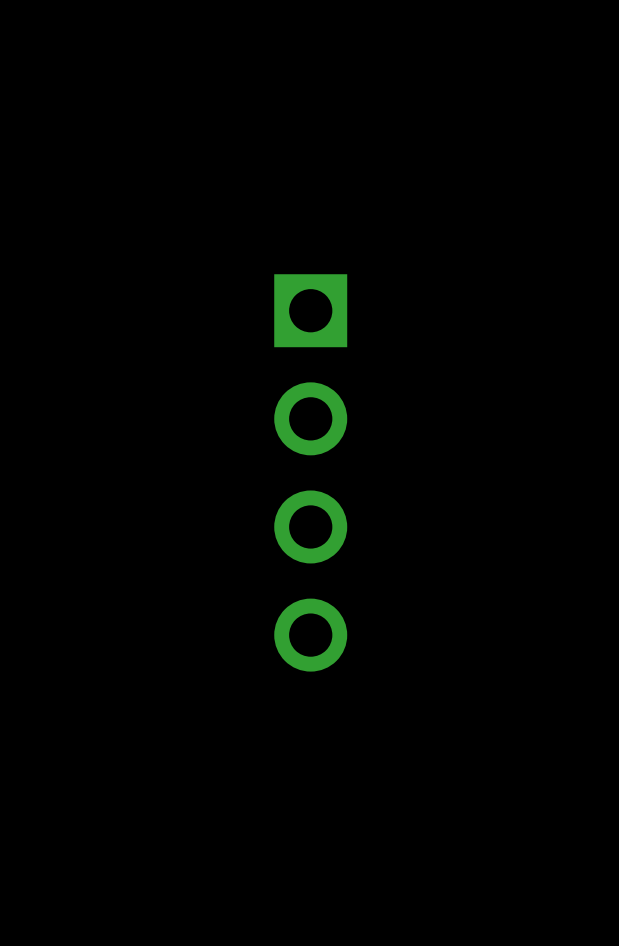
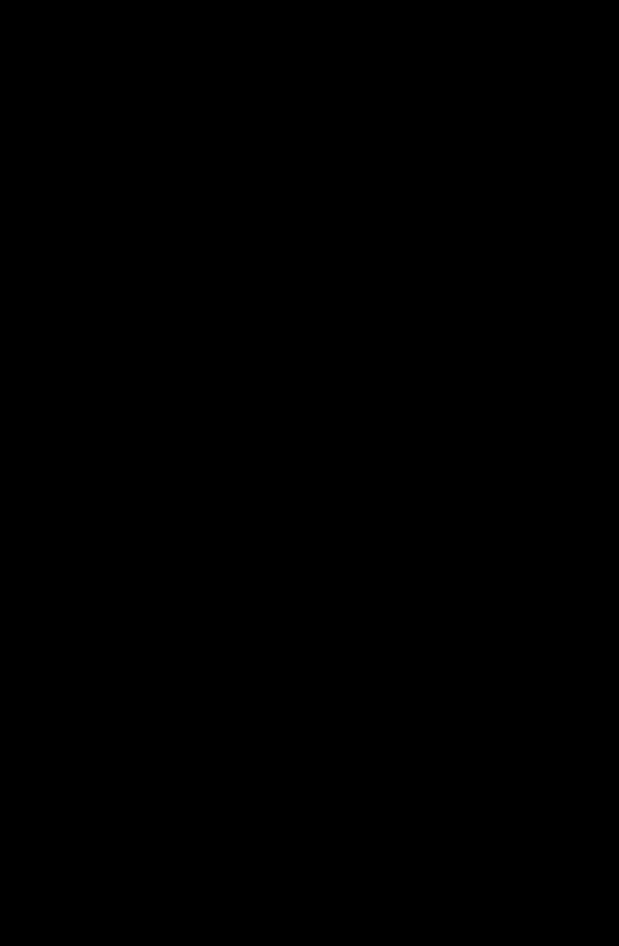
part: (310, 472) -> none

